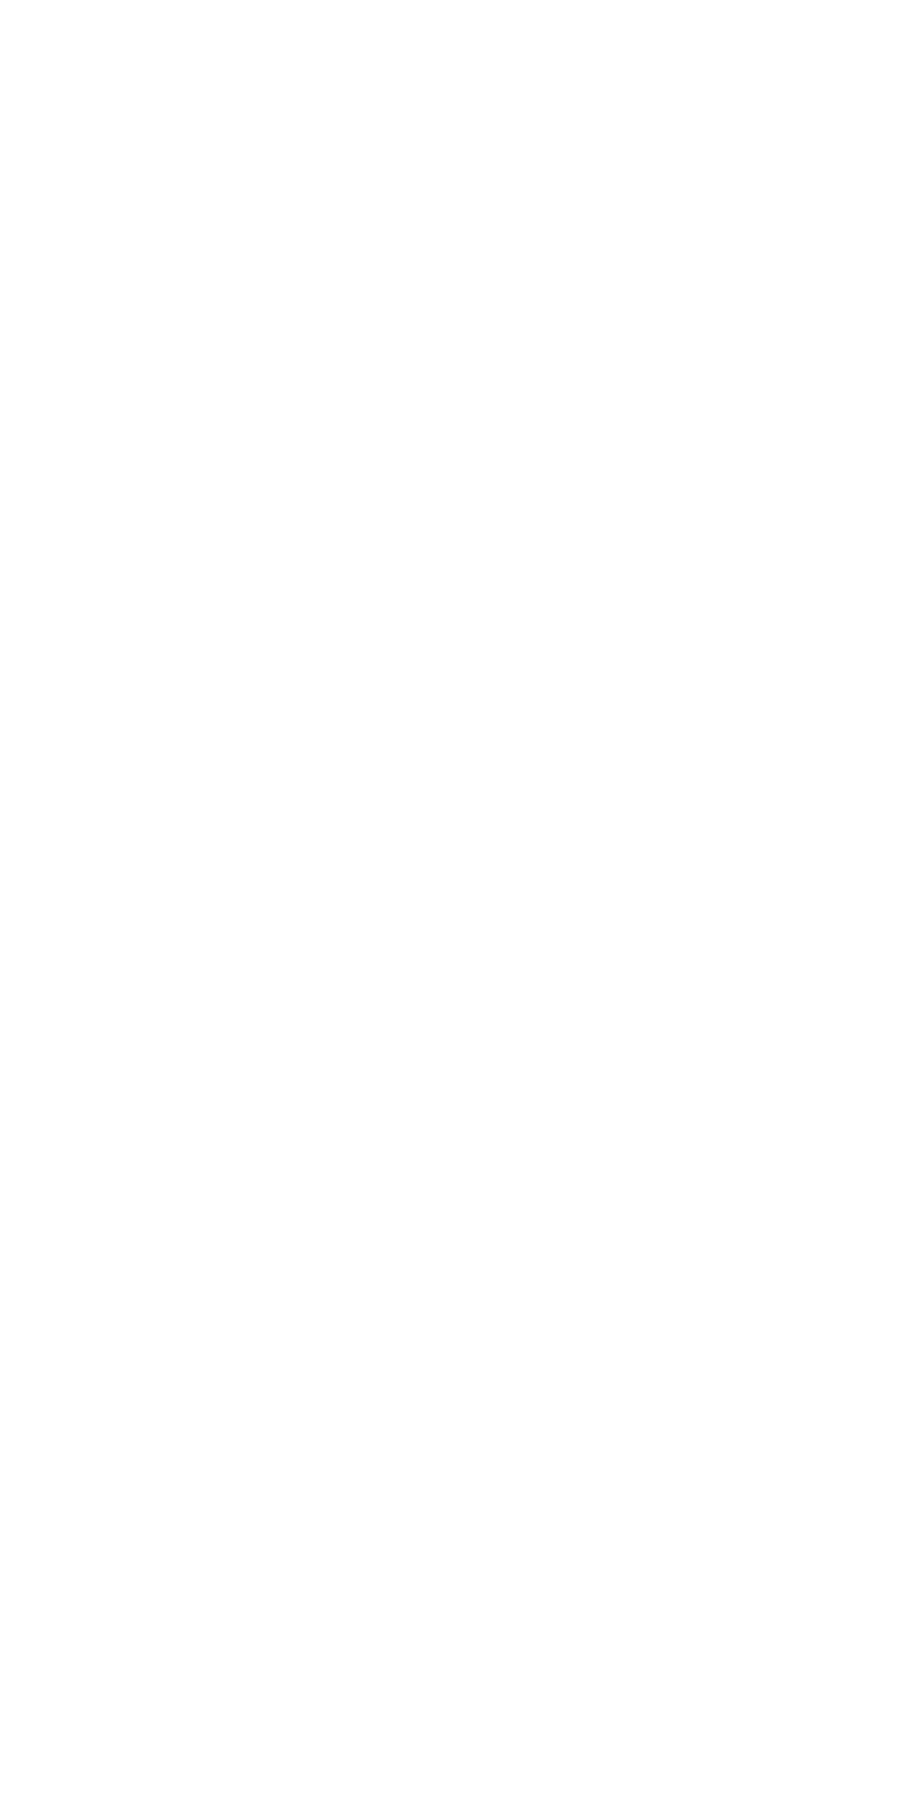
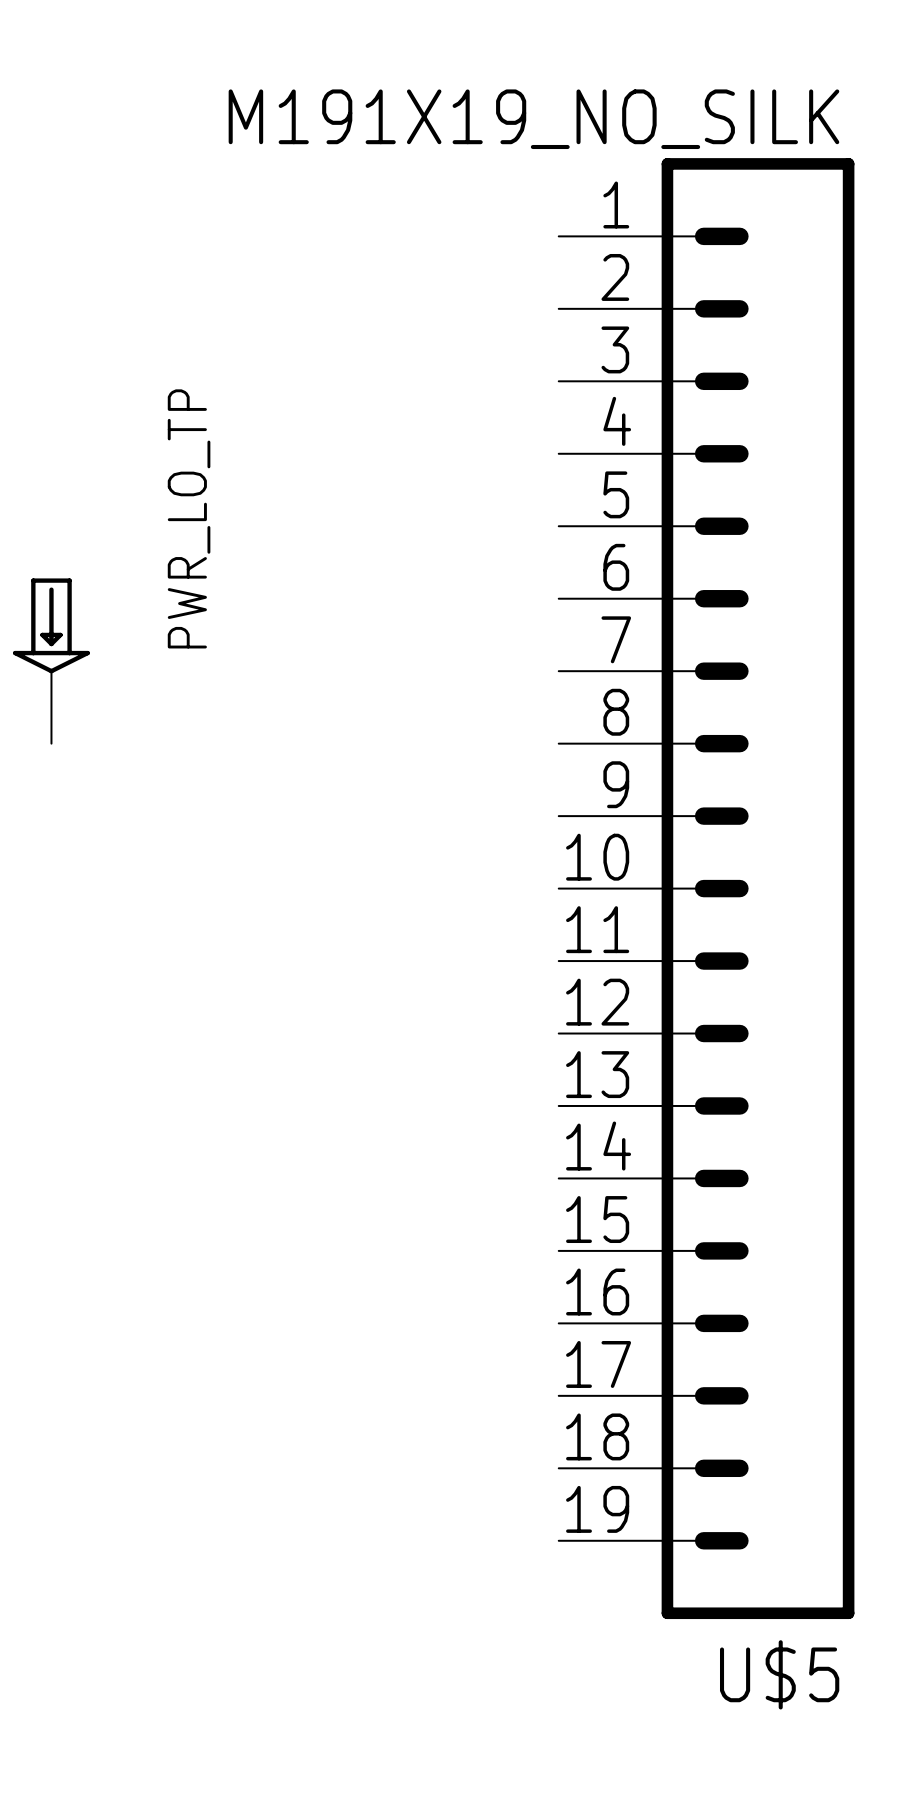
PWR_LO_TP: none -> (51, 661)
U$5: none -> M191X19_NO_SILK (706, 888)

